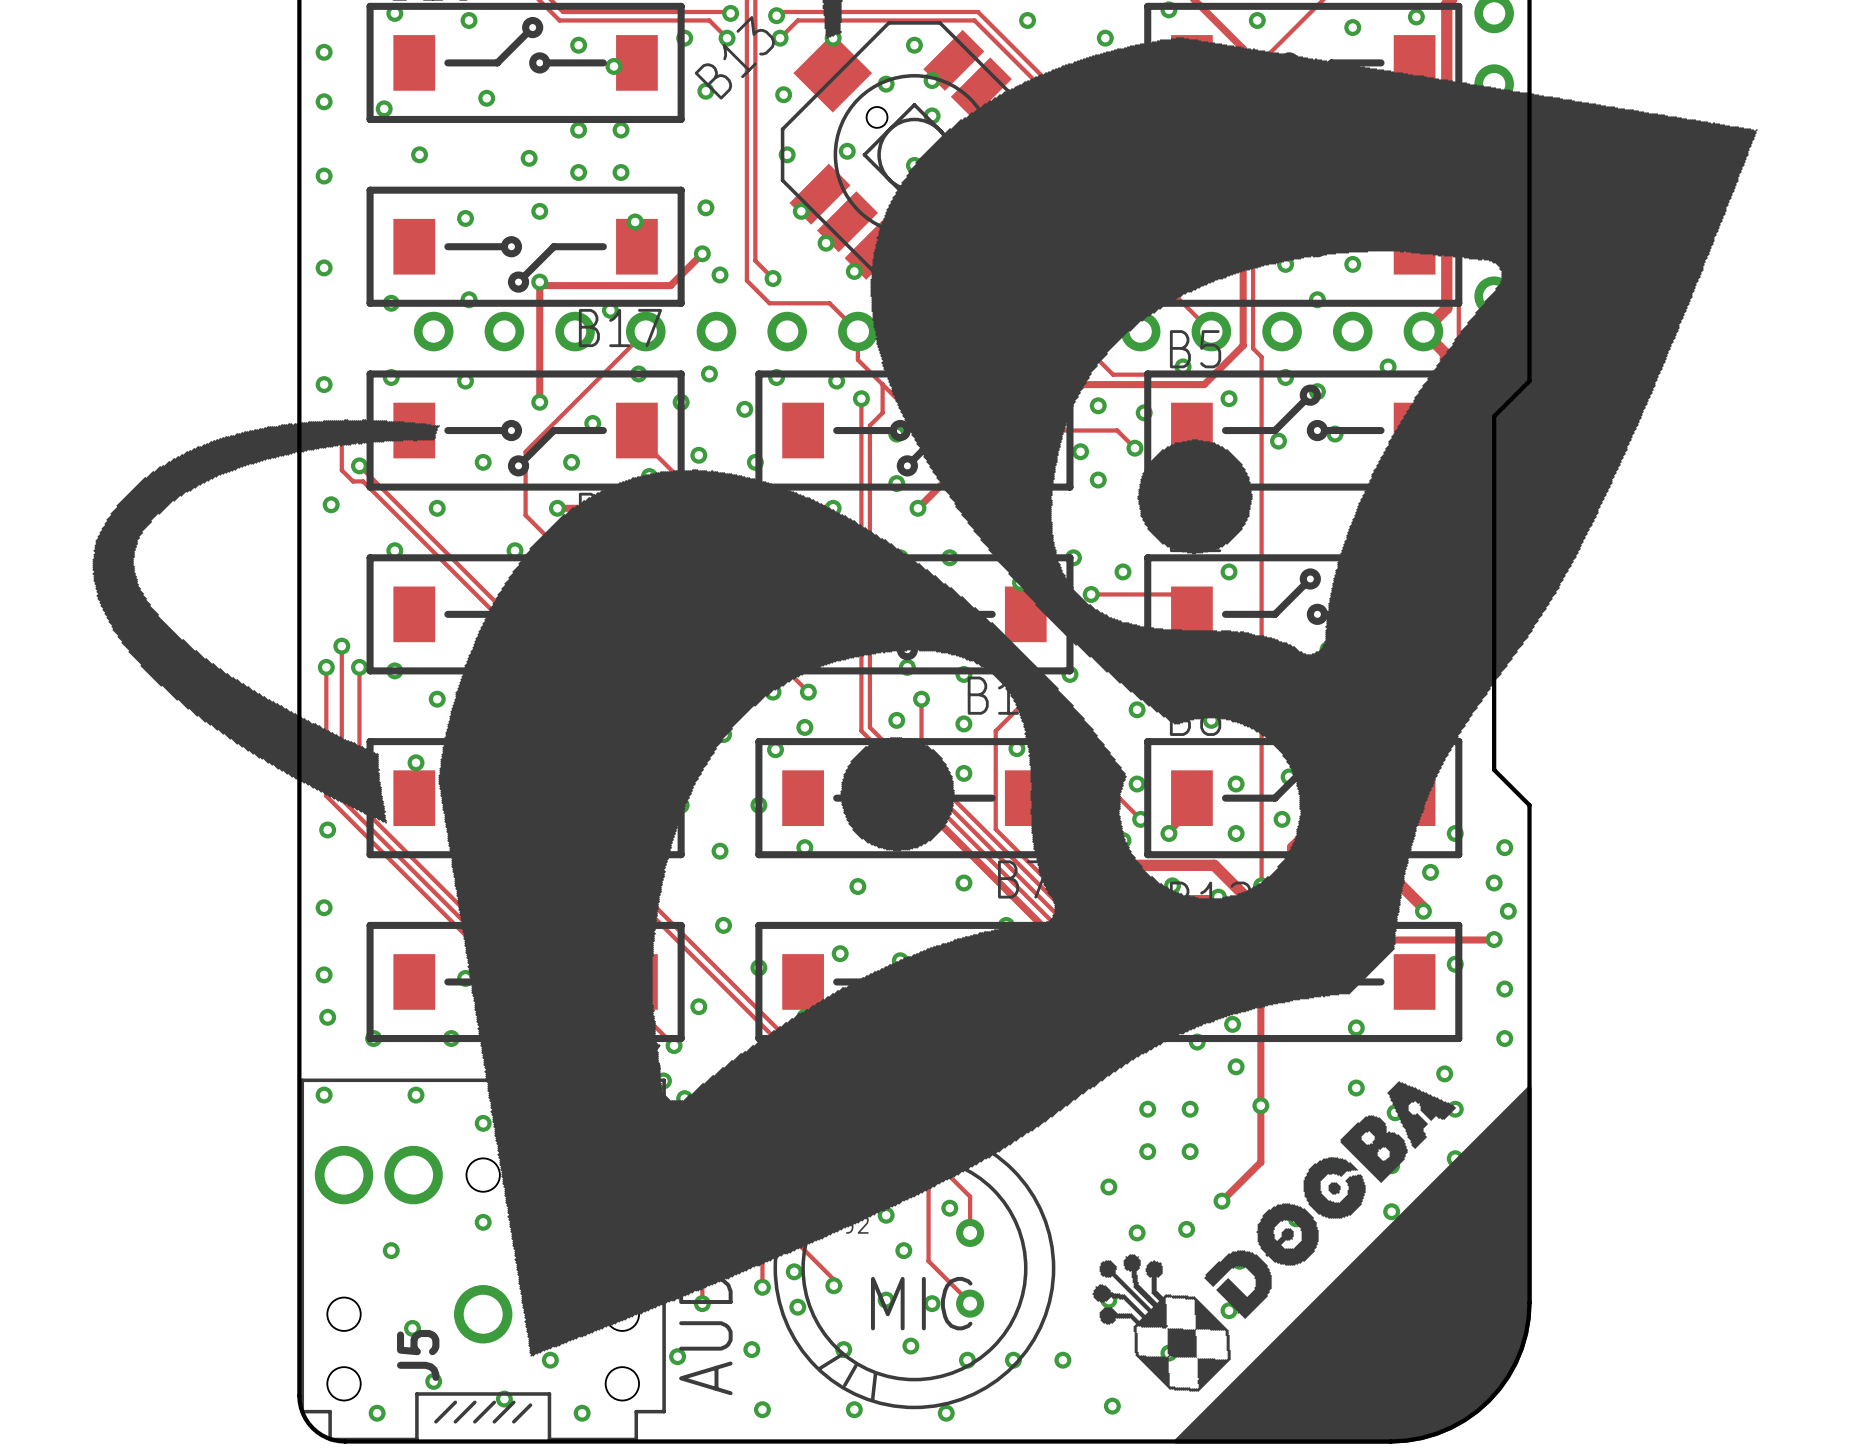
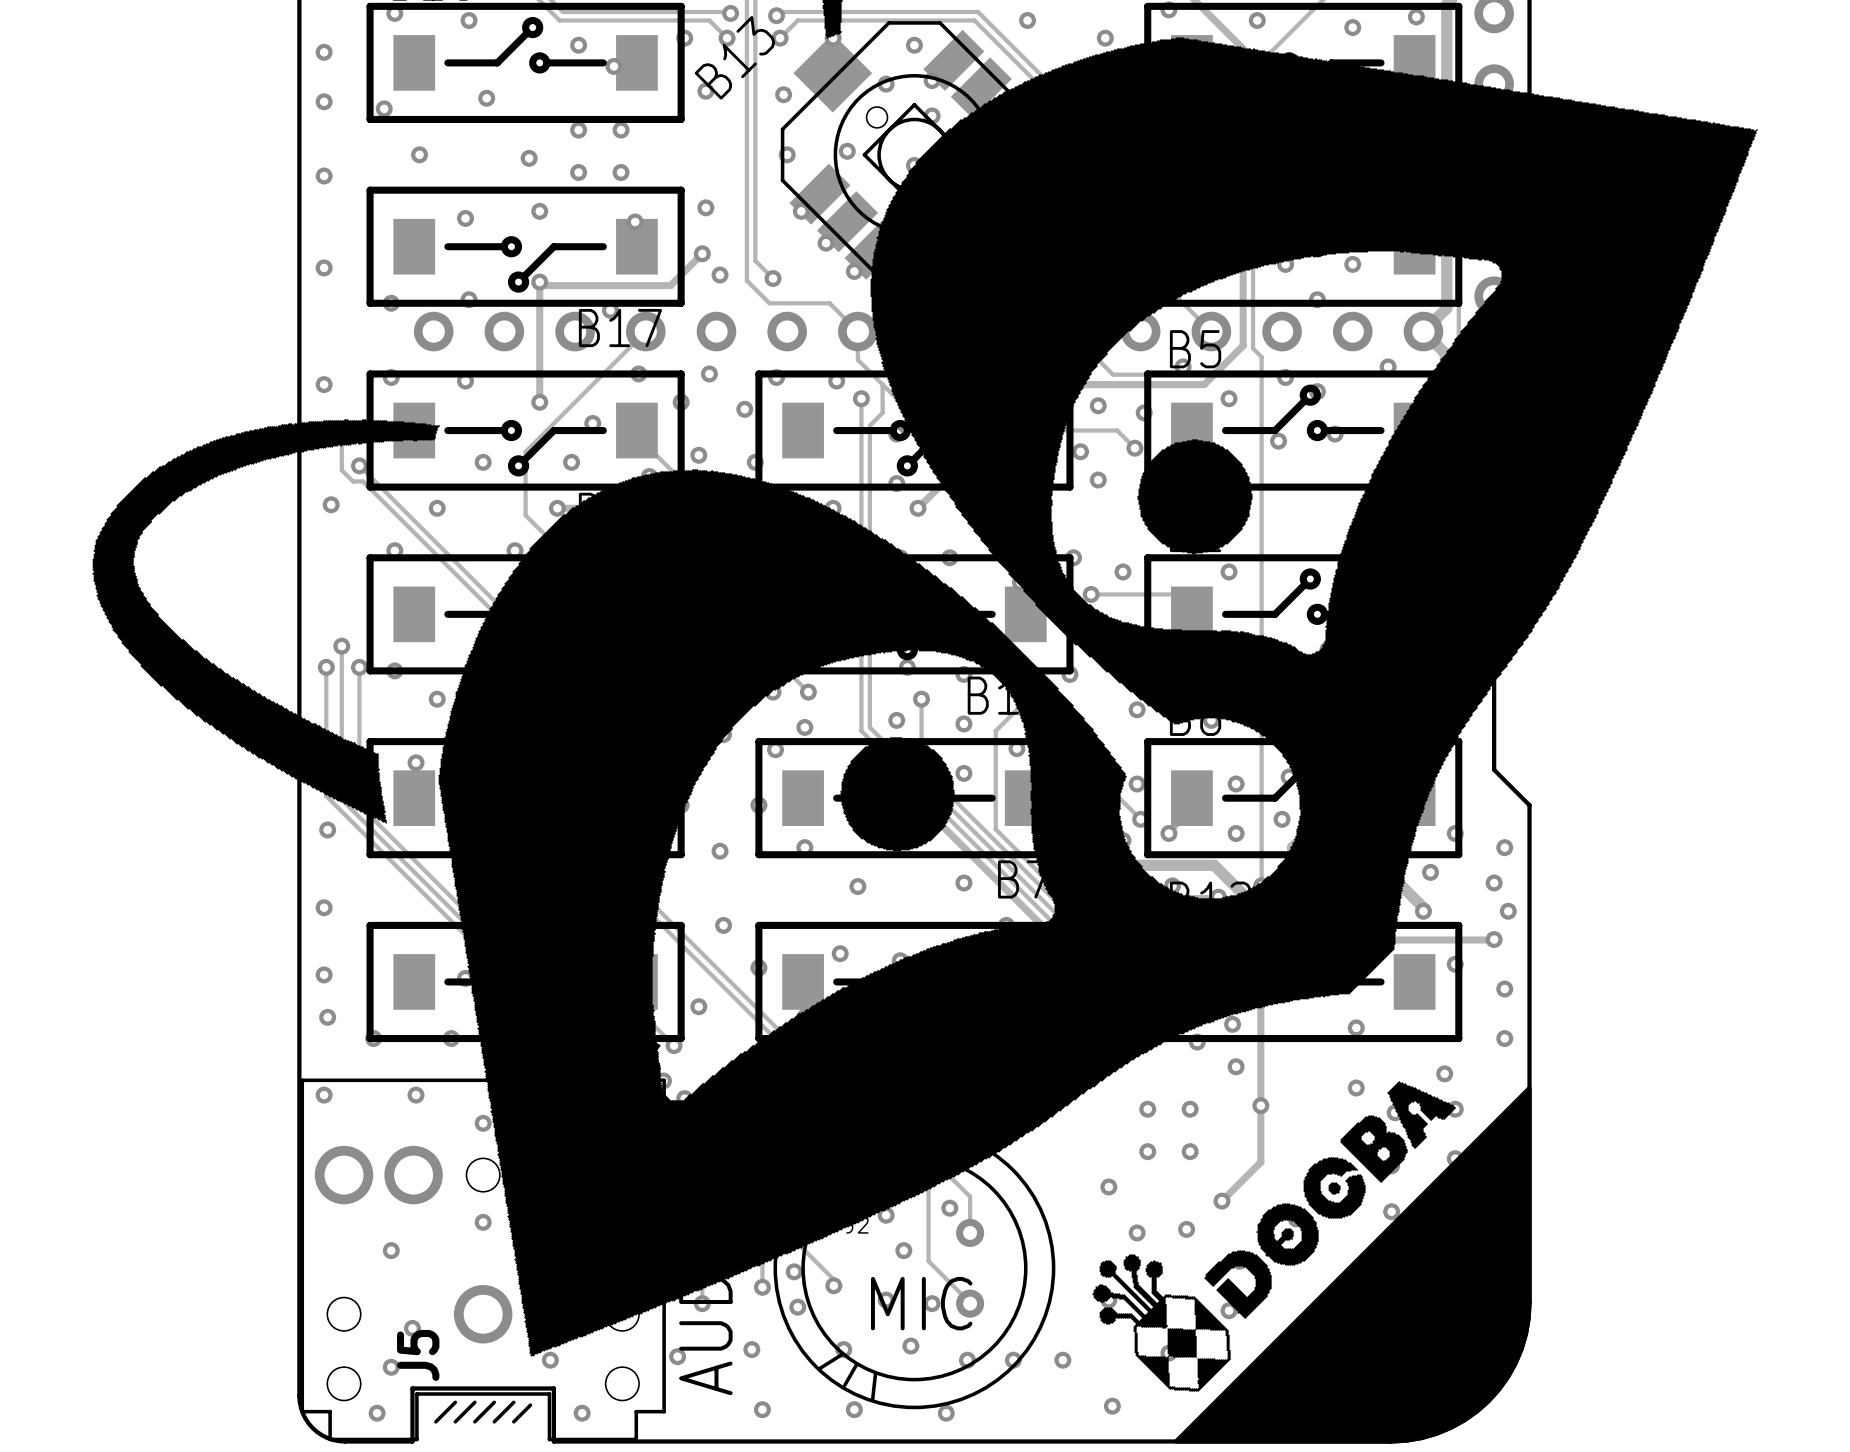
via position: (433, 1381) -> (391, 1367)
via: (504, 1399) -> none
board edge: (412, 1441) (553, 1441) -> (412, 1441) (412, 1388) (553, 1388) (553, 1441)

